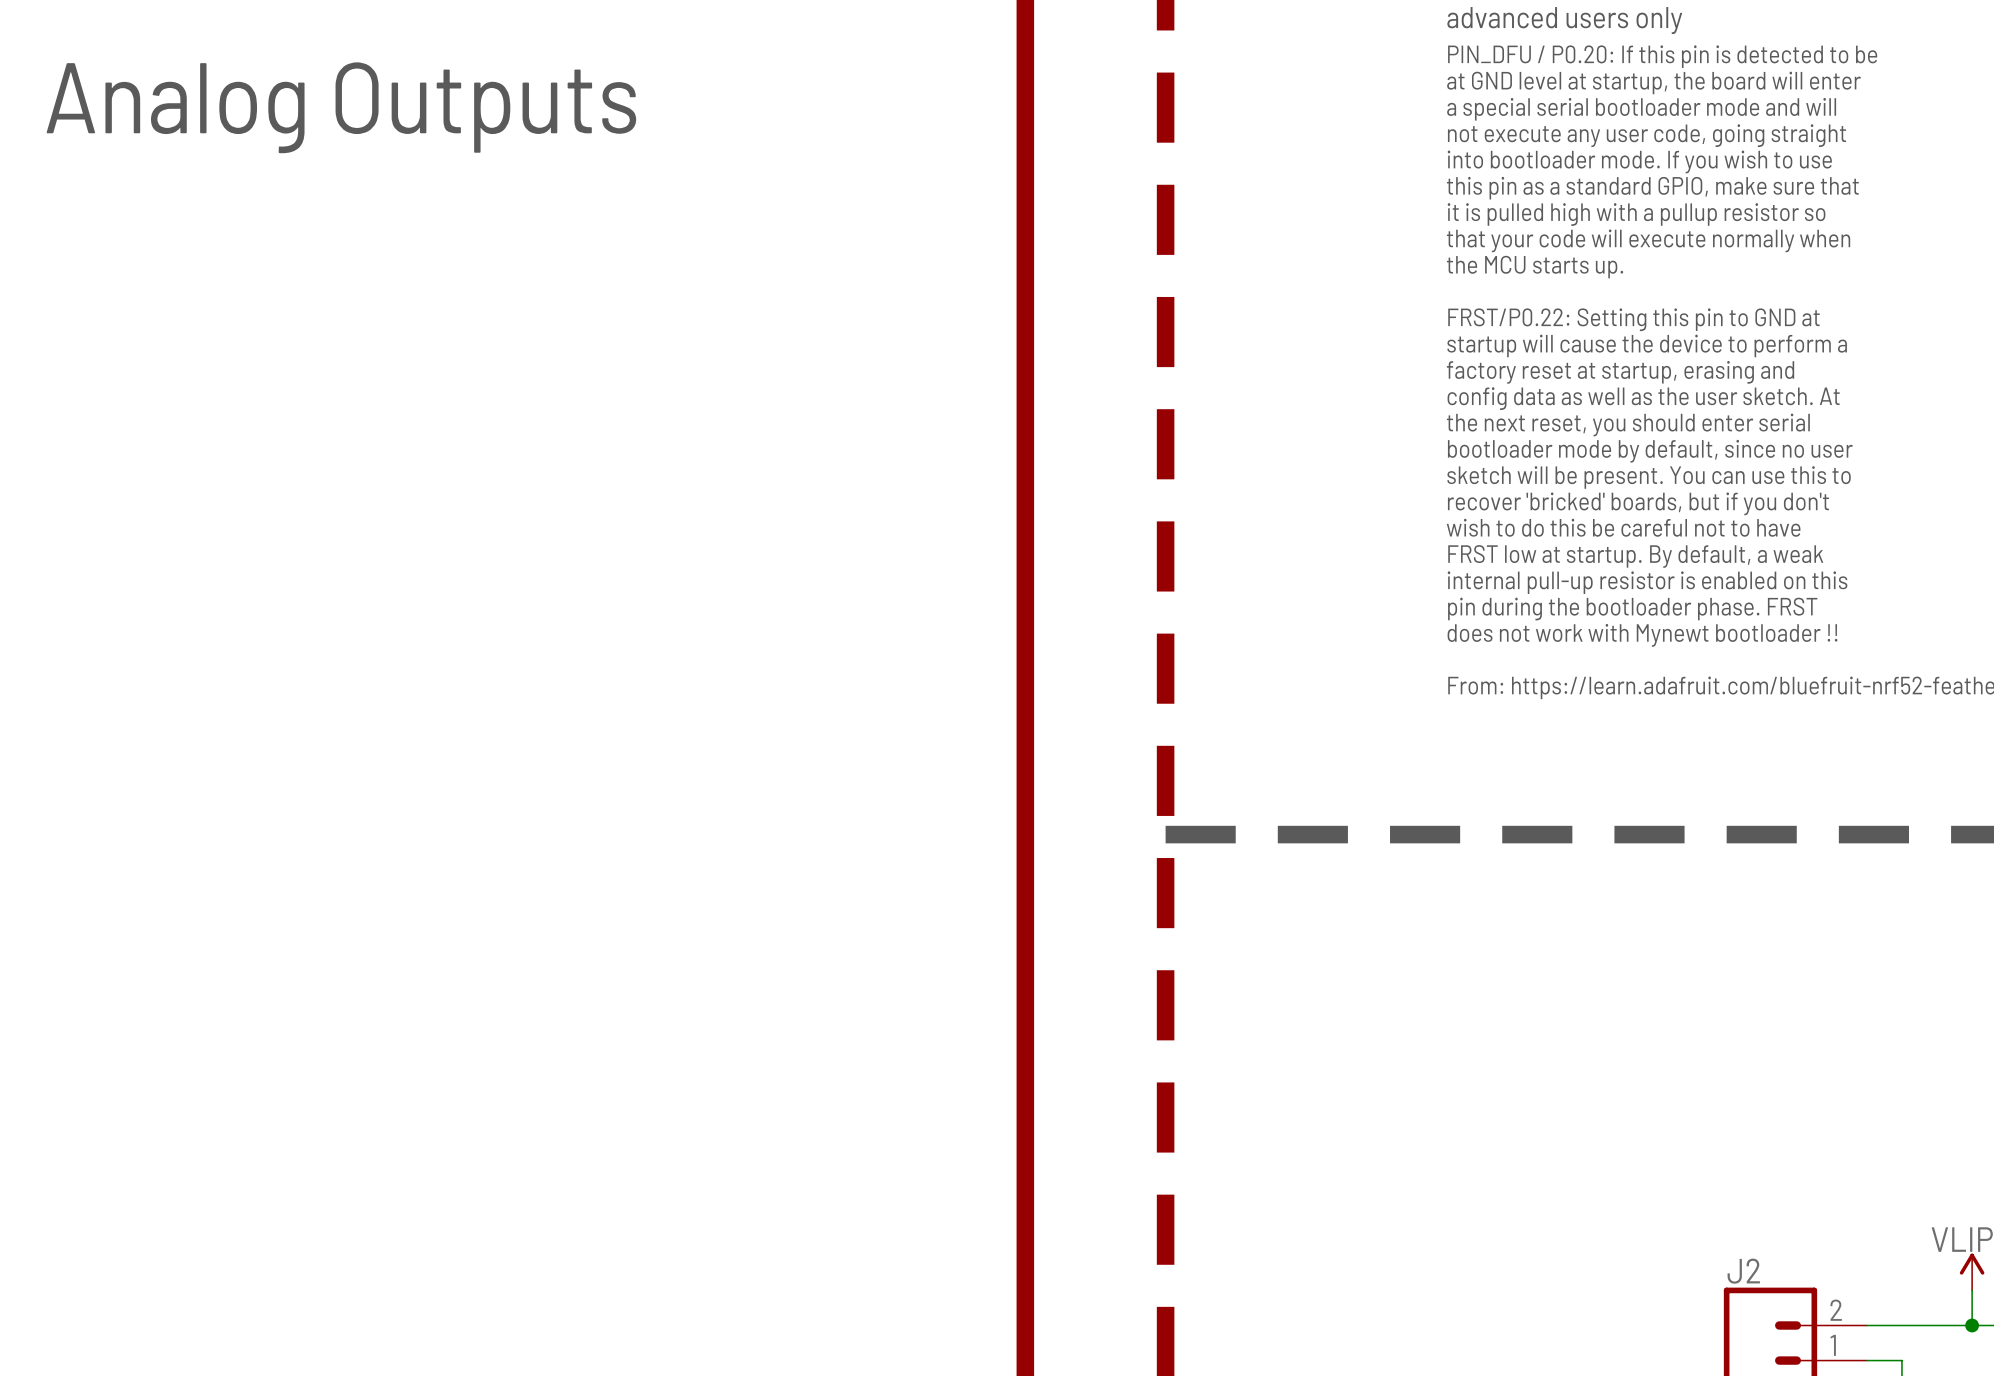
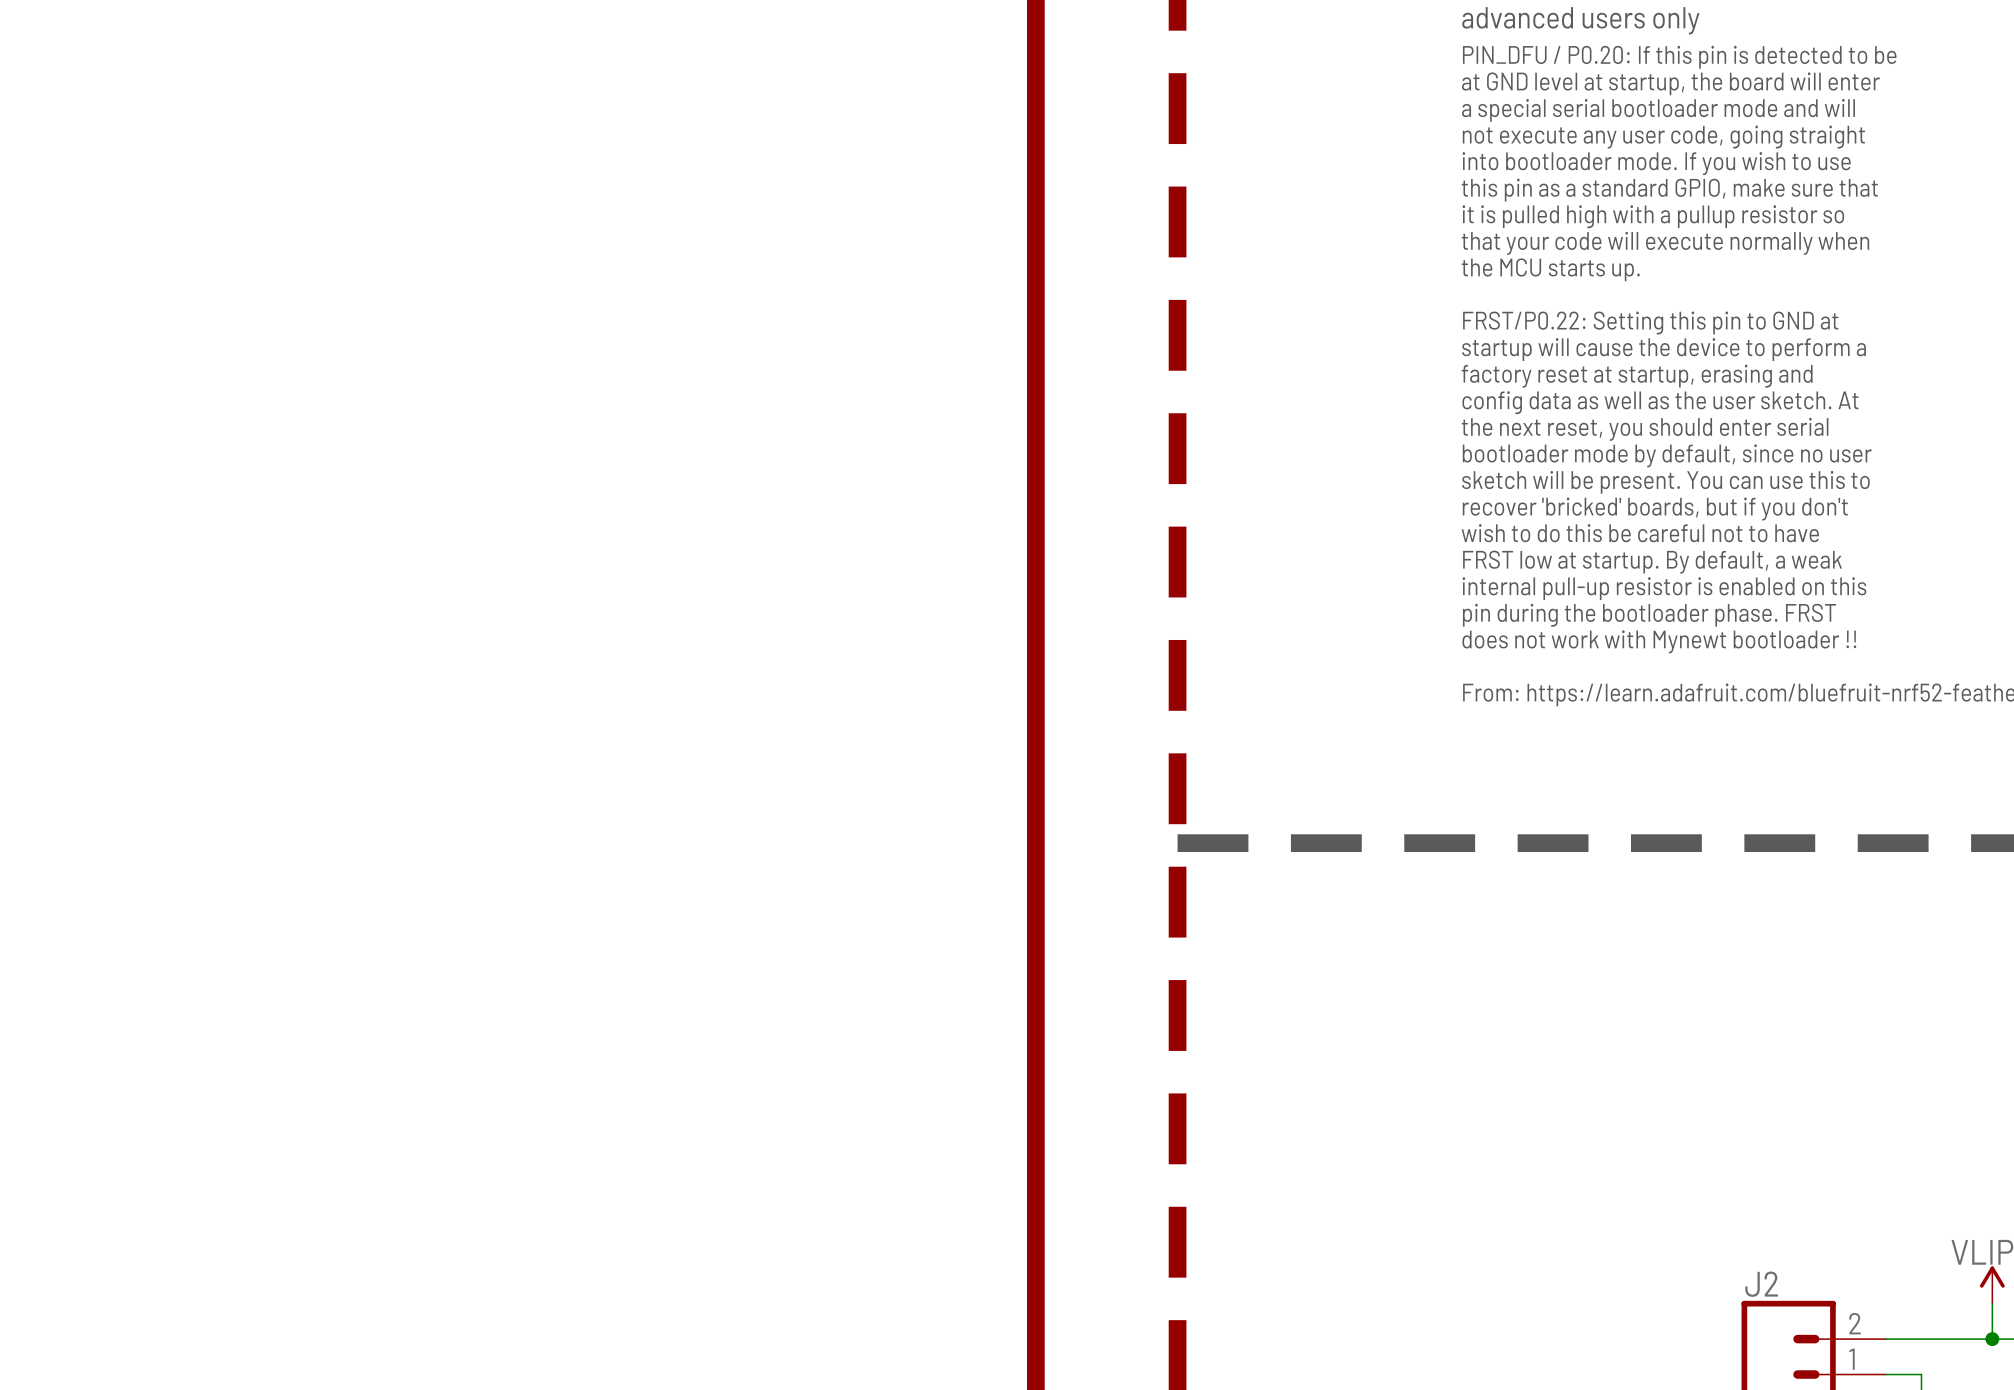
text: Analog Outputs (341, 107) -> none

